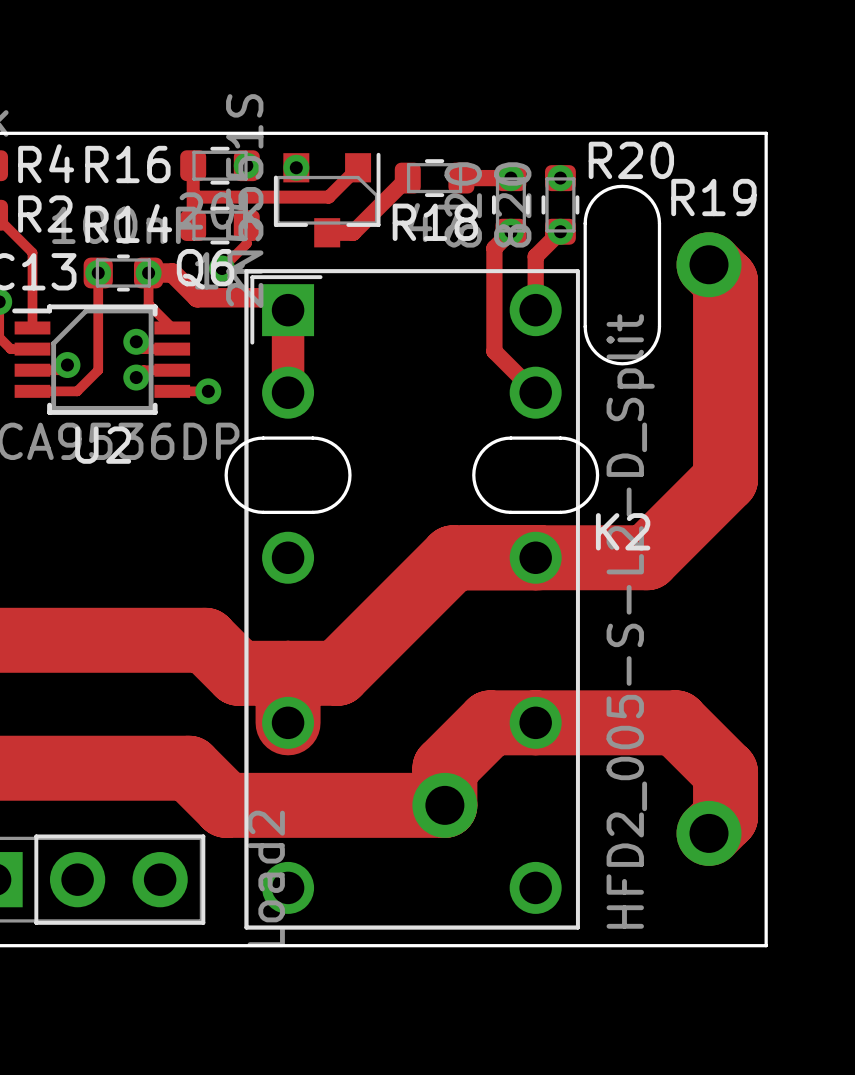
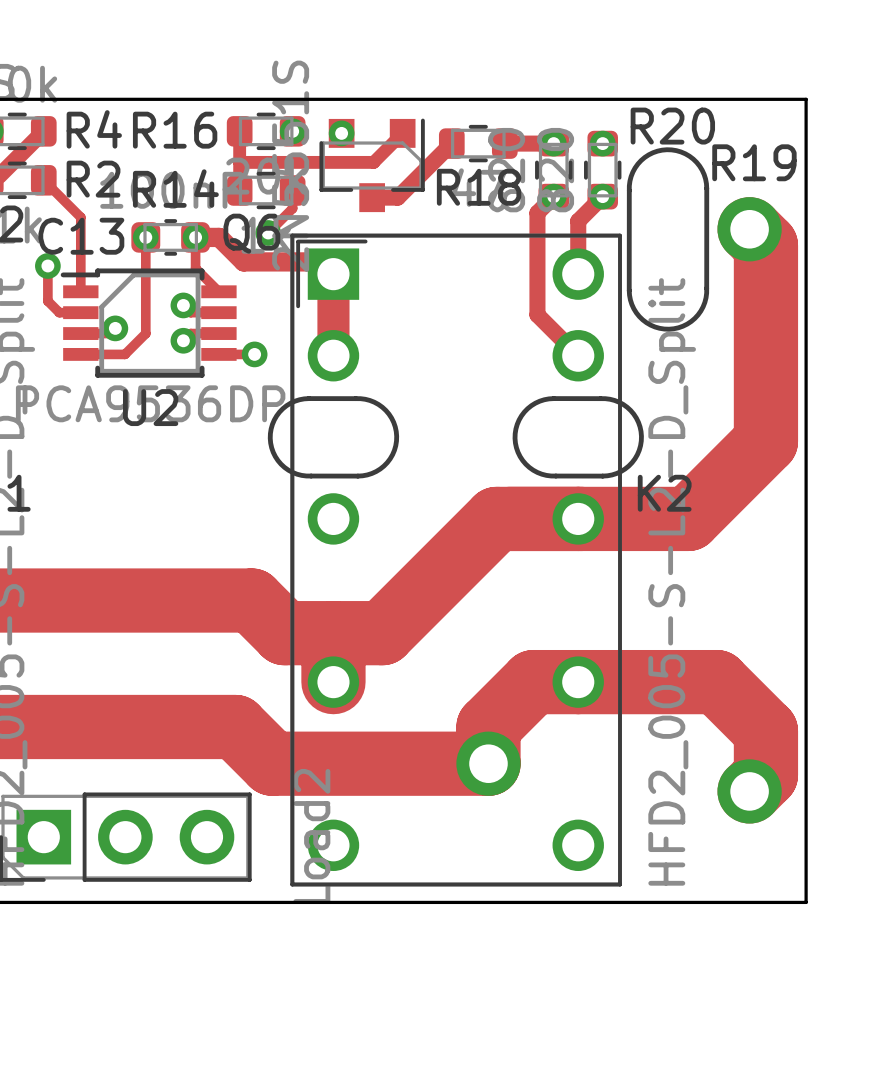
board edge: (585, 223) (585, 326) (588, 340) (596, 352) (608, 360) (622, 363) (636, 360) (651, 349) (659, 331) (659, 223) (656, 209) (648, 197) (636, 189) (622, 186) (612, 187) (603, 191) (592, 200) (588, 209) (585, 223) -> none
line: none -> (706, 188) (706, 293) (704, 302) (698, 314) (687, 324) (669, 329) (655, 326) (639, 316) (631, 304) (629, 295) (629, 185) (631, 176) (637, 164) (648, 154) (662, 150) (676, 150) (689, 156) (699, 166) (704, 174) (706, 188)
line: none -> (308, 398) (360, 398) (374, 402) (382, 407) (391, 418) (396, 436) (394, 450) (387, 462) (376, 471) (357, 476) (306, 476) (297, 474) (284, 467) (275, 456) (271, 447) (270, 438) (272, 424) (276, 415) (286, 405) (295, 401) (308, 398)
line: none -> (553, 398) (605, 398) (619, 402) (627, 407) (636, 418) (641, 436) (639, 450) (632, 462) (621, 471) (602, 476) (551, 476) (541, 474) (529, 467) (520, 456) (516, 447) (515, 438) (517, 424) (521, 415) (531, 405) (539, 401) (553, 398)
board edge: (263, 438) (317, 438) (335, 445) (344, 456) (349, 470) (348, 484) (342, 497) (331, 507) (317, 512) (258, 512) (240, 504) (231, 493) (227, 484) (226, 475) (228, 461) (237, 448) (244, 443) (263, 438) -> none
board edge: (510, 438) (565, 438) (583, 445) (592, 456) (597, 470) (596, 484) (589, 497) (579, 507) (565, 512) (506, 512) (488, 504) (478, 493) (475, 484) (473, 475) (476, 461) (484, 448) (492, 443) (510, 438) -> none

